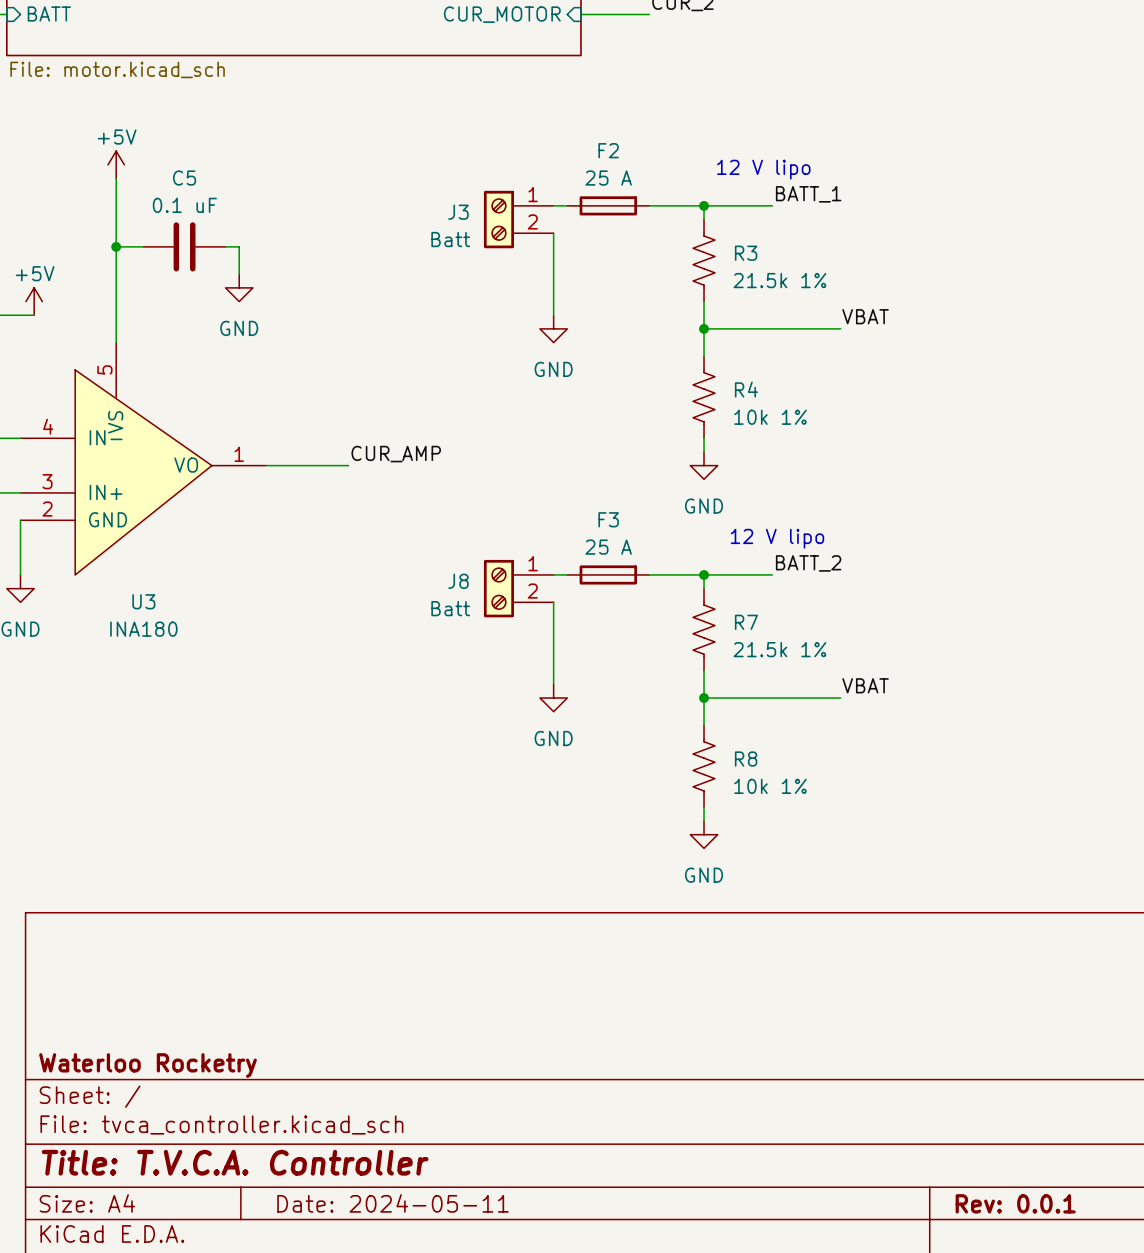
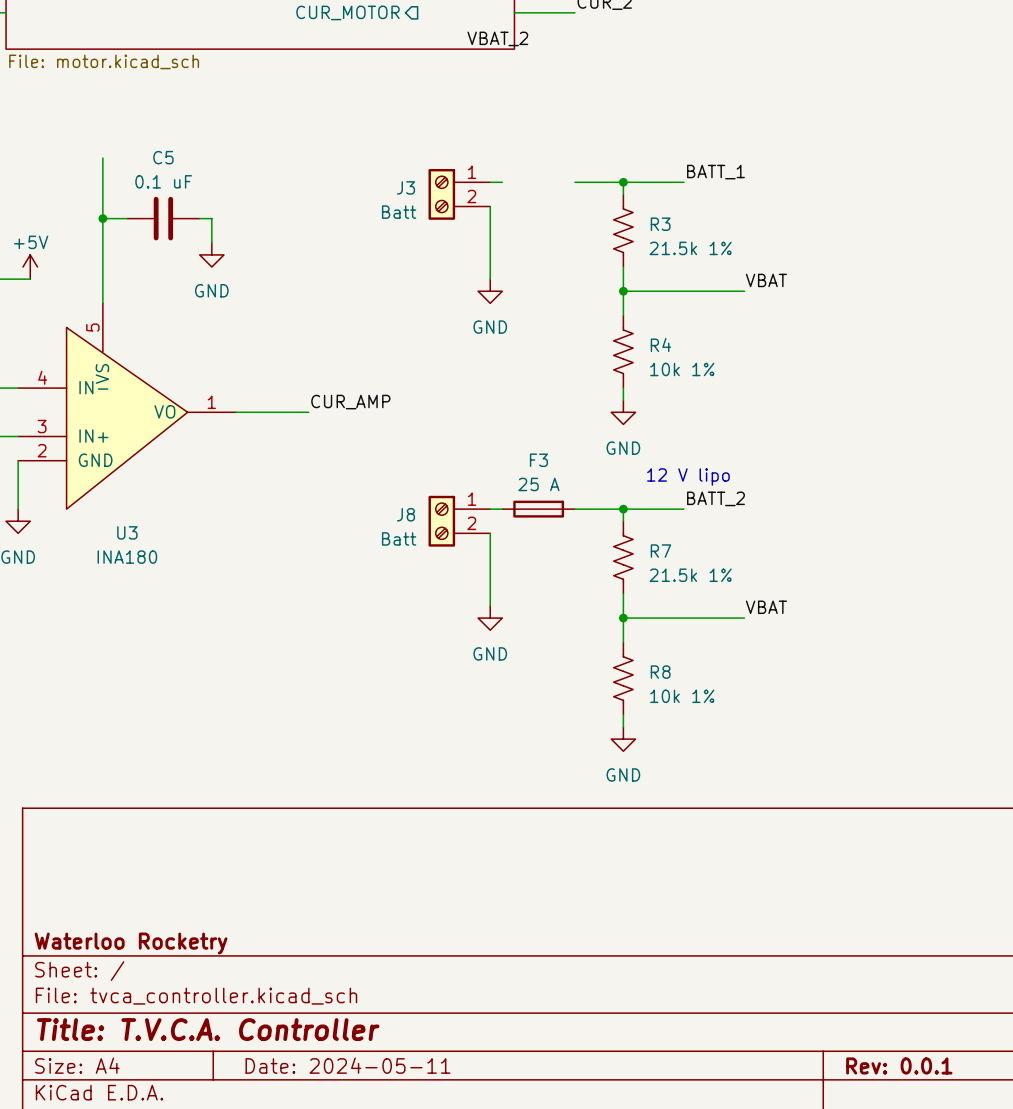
sheet pin: BATT (49, 13) -> none
sheet pin position: CUR_MOTOR (502, 14) -> CUR_MOTOR (347, 12)
label: none -> VBAT_2 (497, 38)
power symbol: +5V (116, 164) -> none
text: 12 V lipo (763, 169) -> none
F2: 25 A (608, 205) -> none

